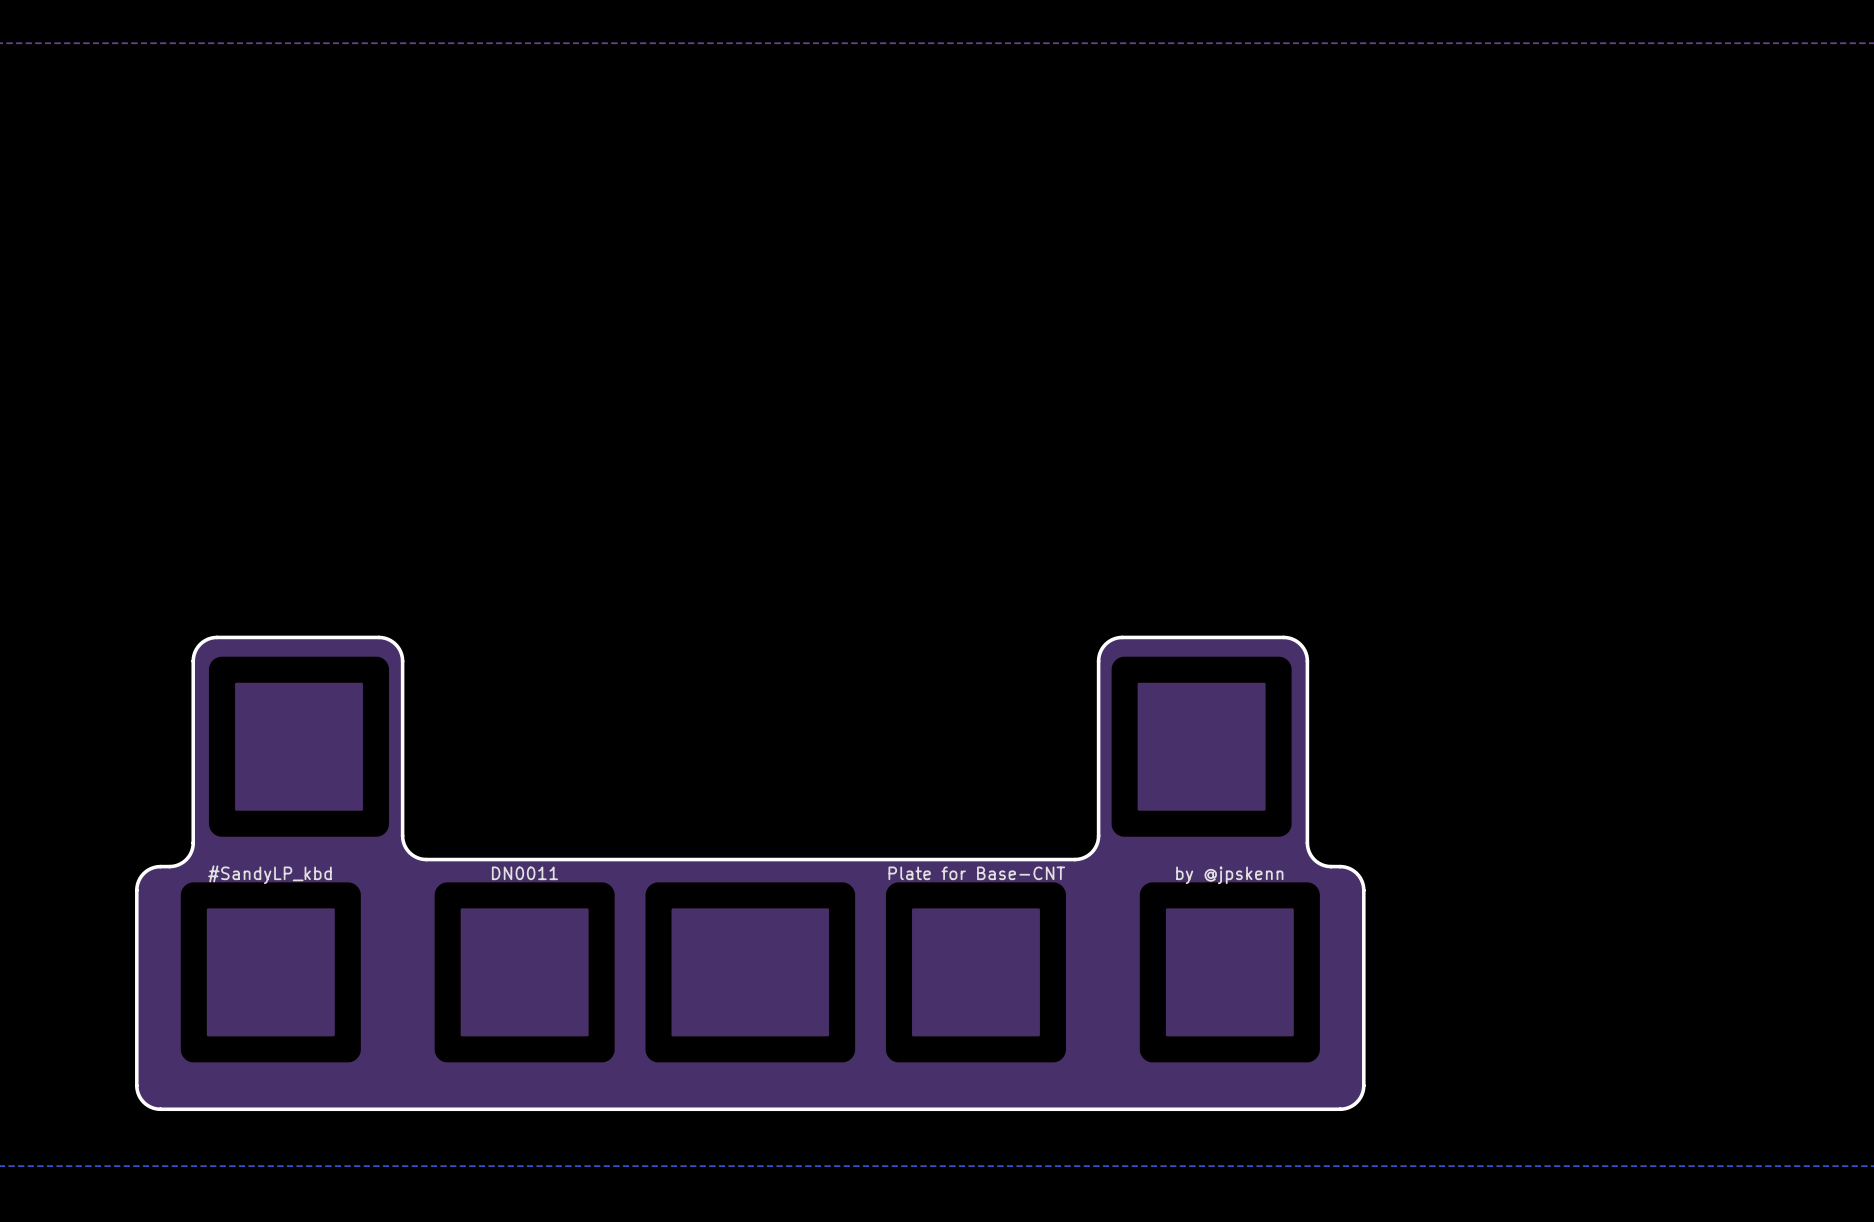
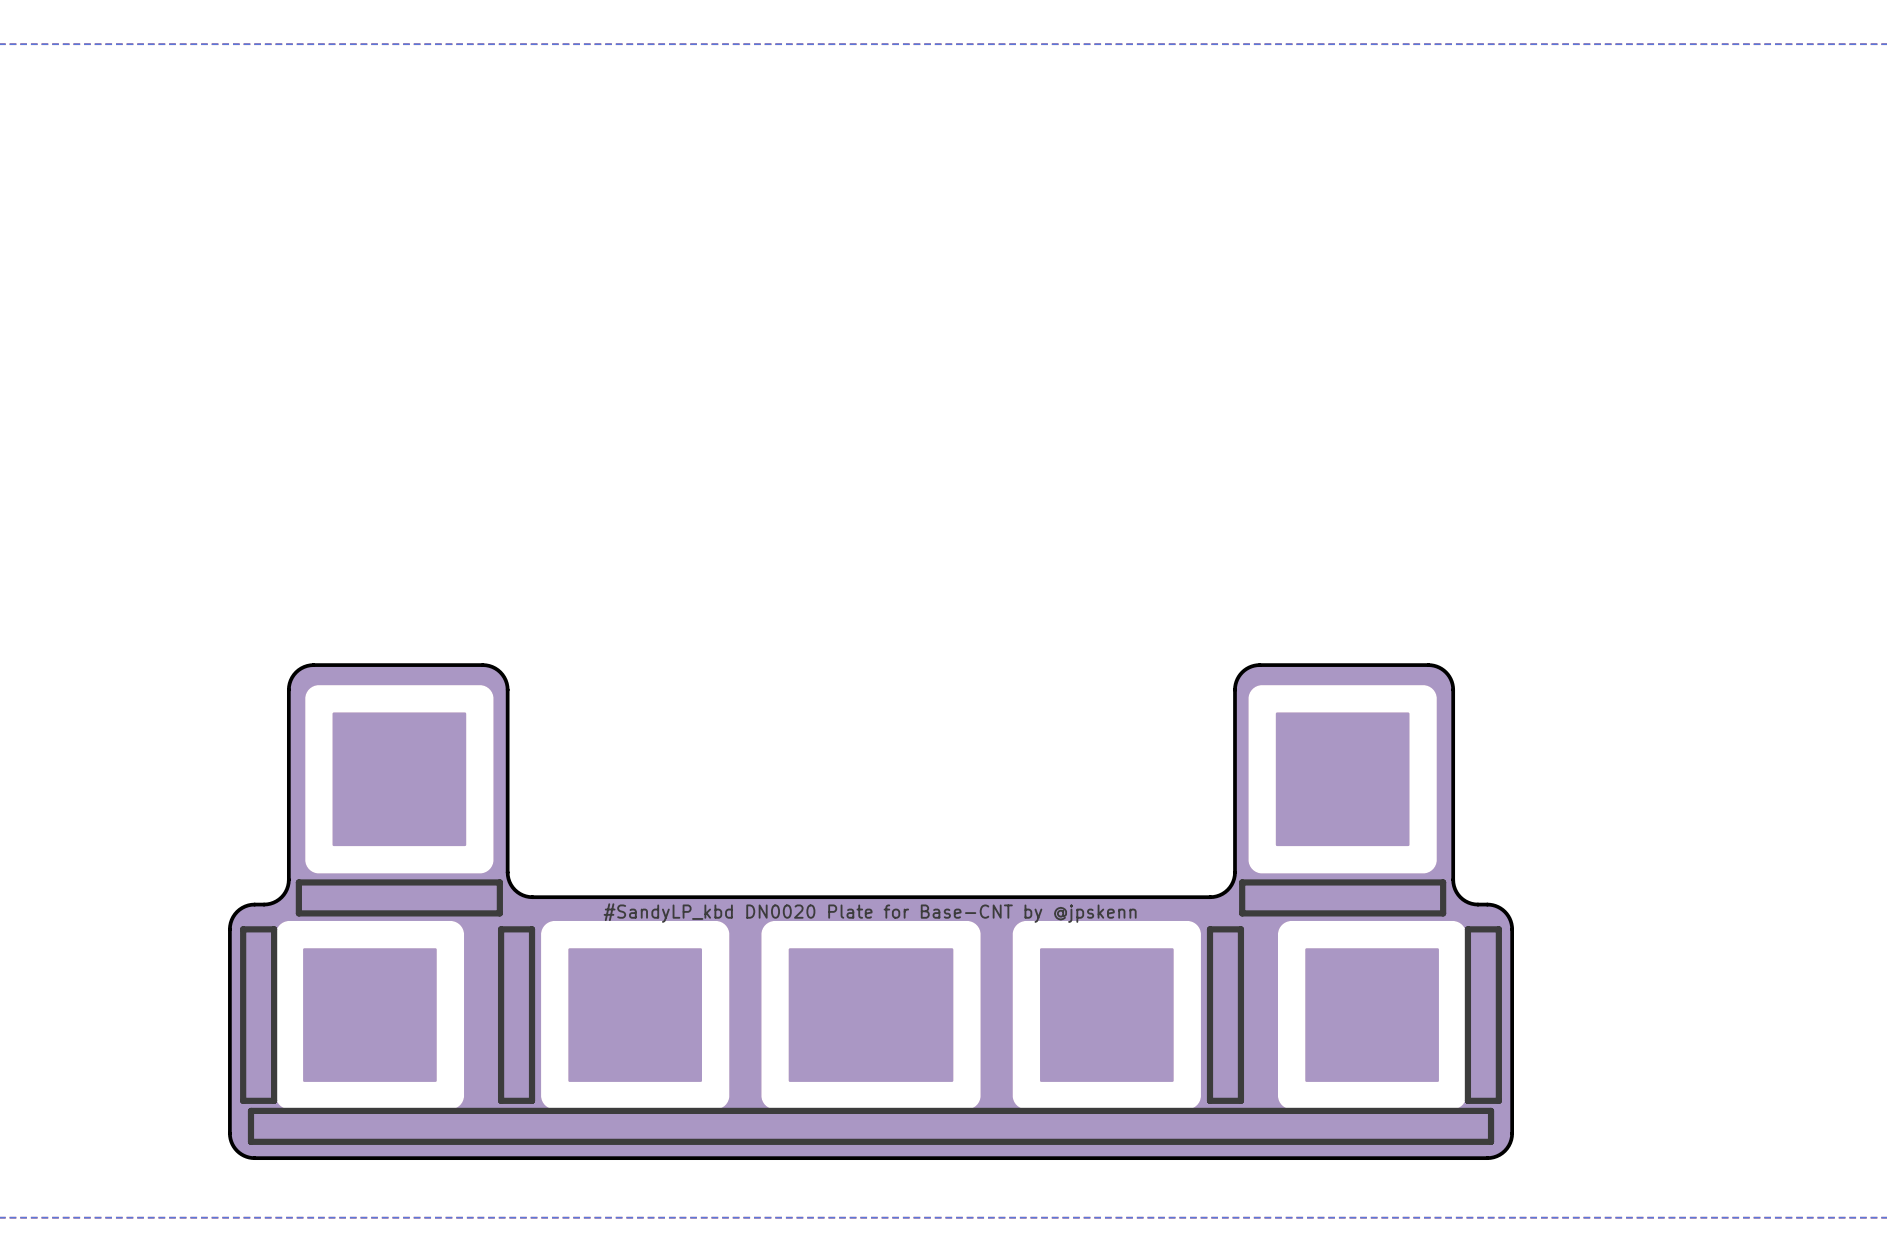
line: none -> (499, 882) (298, 882) (298, 913) (499, 913) (499, 882)
line: none -> (1443, 882) (1242, 882) (1242, 913) (1443, 913) (1443, 882)
text: DN0011 (524, 873) -> none
text: Plate for Base-CNT (976, 873) -> none
text: #SandyLP_kbd (269, 874) -> none
text: none -> #SandyLP_kbd DN0020 Plate for Base-CNT by @jpskenn (870, 913)
text: by @jpskenn (1229, 875) -> none
line: none -> (274, 929) (243, 929) (243, 1100) (274, 1100) (274, 929)
line: none -> (532, 929) (501, 929) (501, 1100) (532, 1100) (532, 929)
line: none -> (1240, 929) (1210, 929) (1210, 1100) (1240, 1100) (1240, 929)
line: none -> (1498, 929) (1467, 929) (1467, 1100) (1498, 1100) (1498, 929)
line: none -> (1491, 1110) (250, 1110) (250, 1141) (1491, 1141) (1491, 1110)

